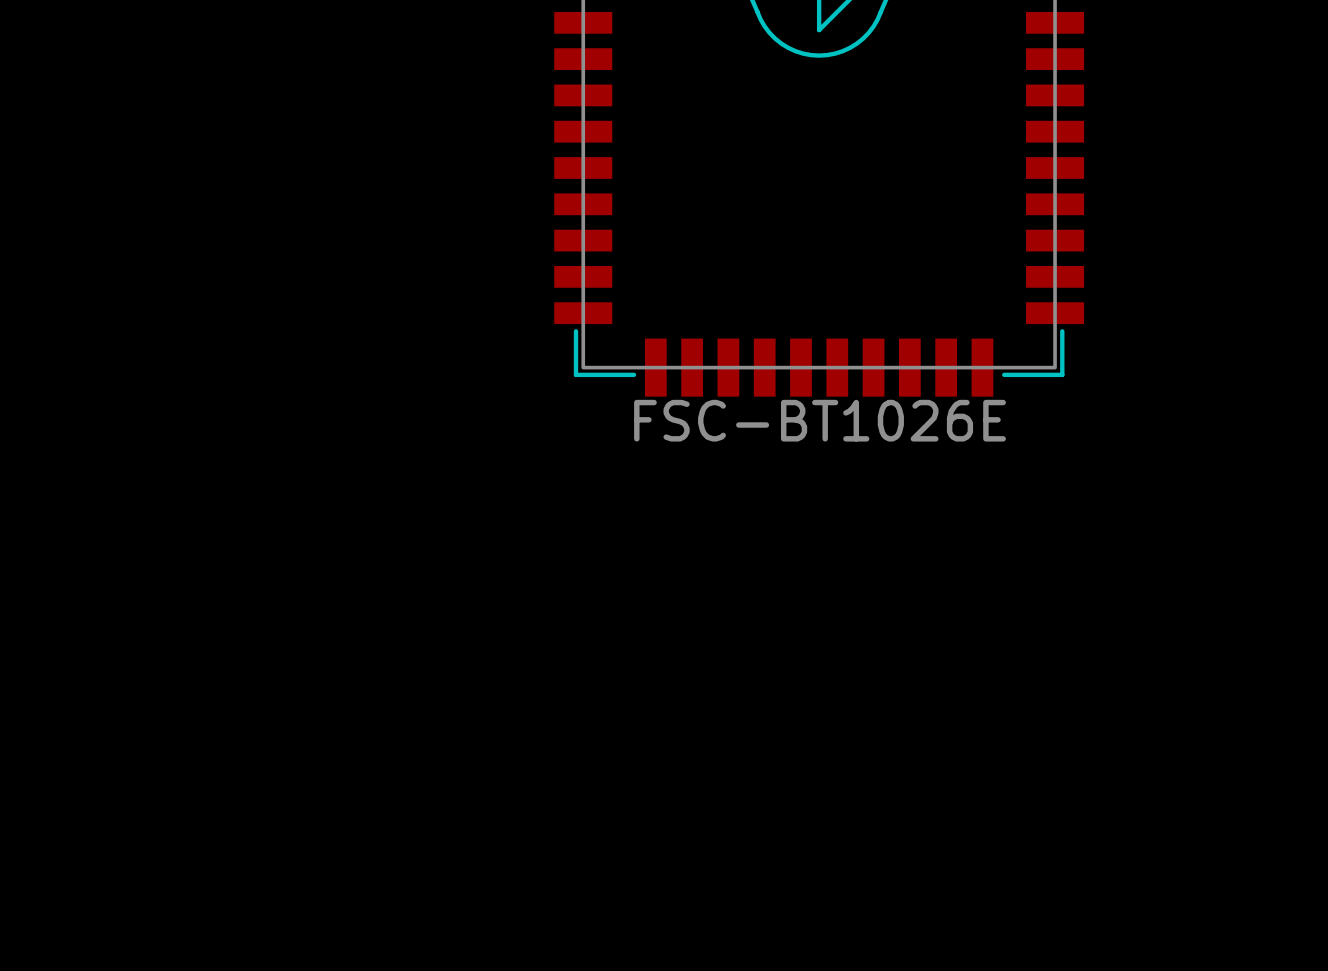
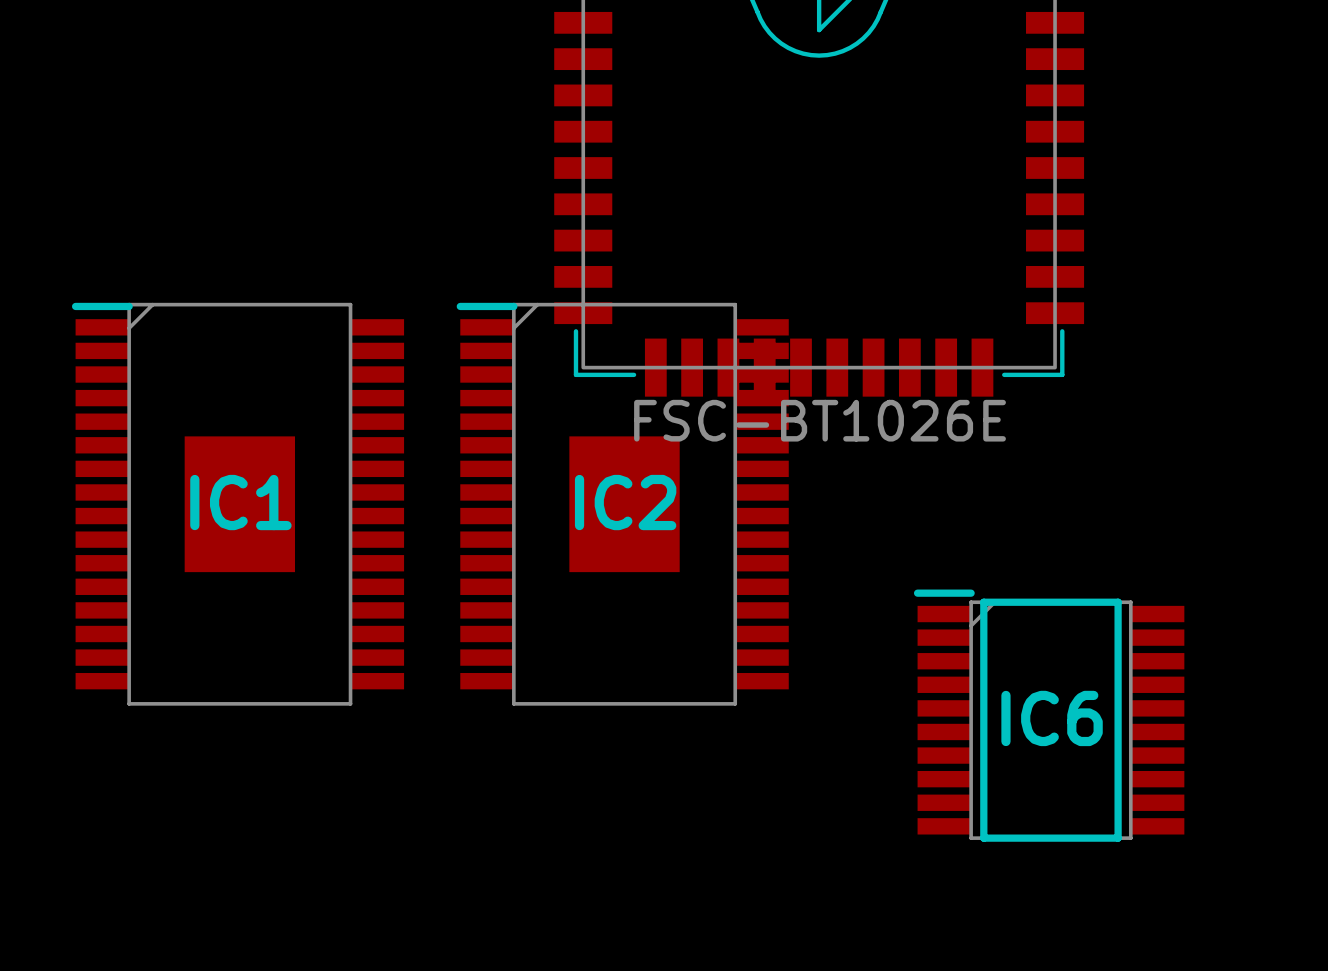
IC1: none -> (238, 504)
IC2: none -> (622, 504)
IC6: none -> (1049, 715)

